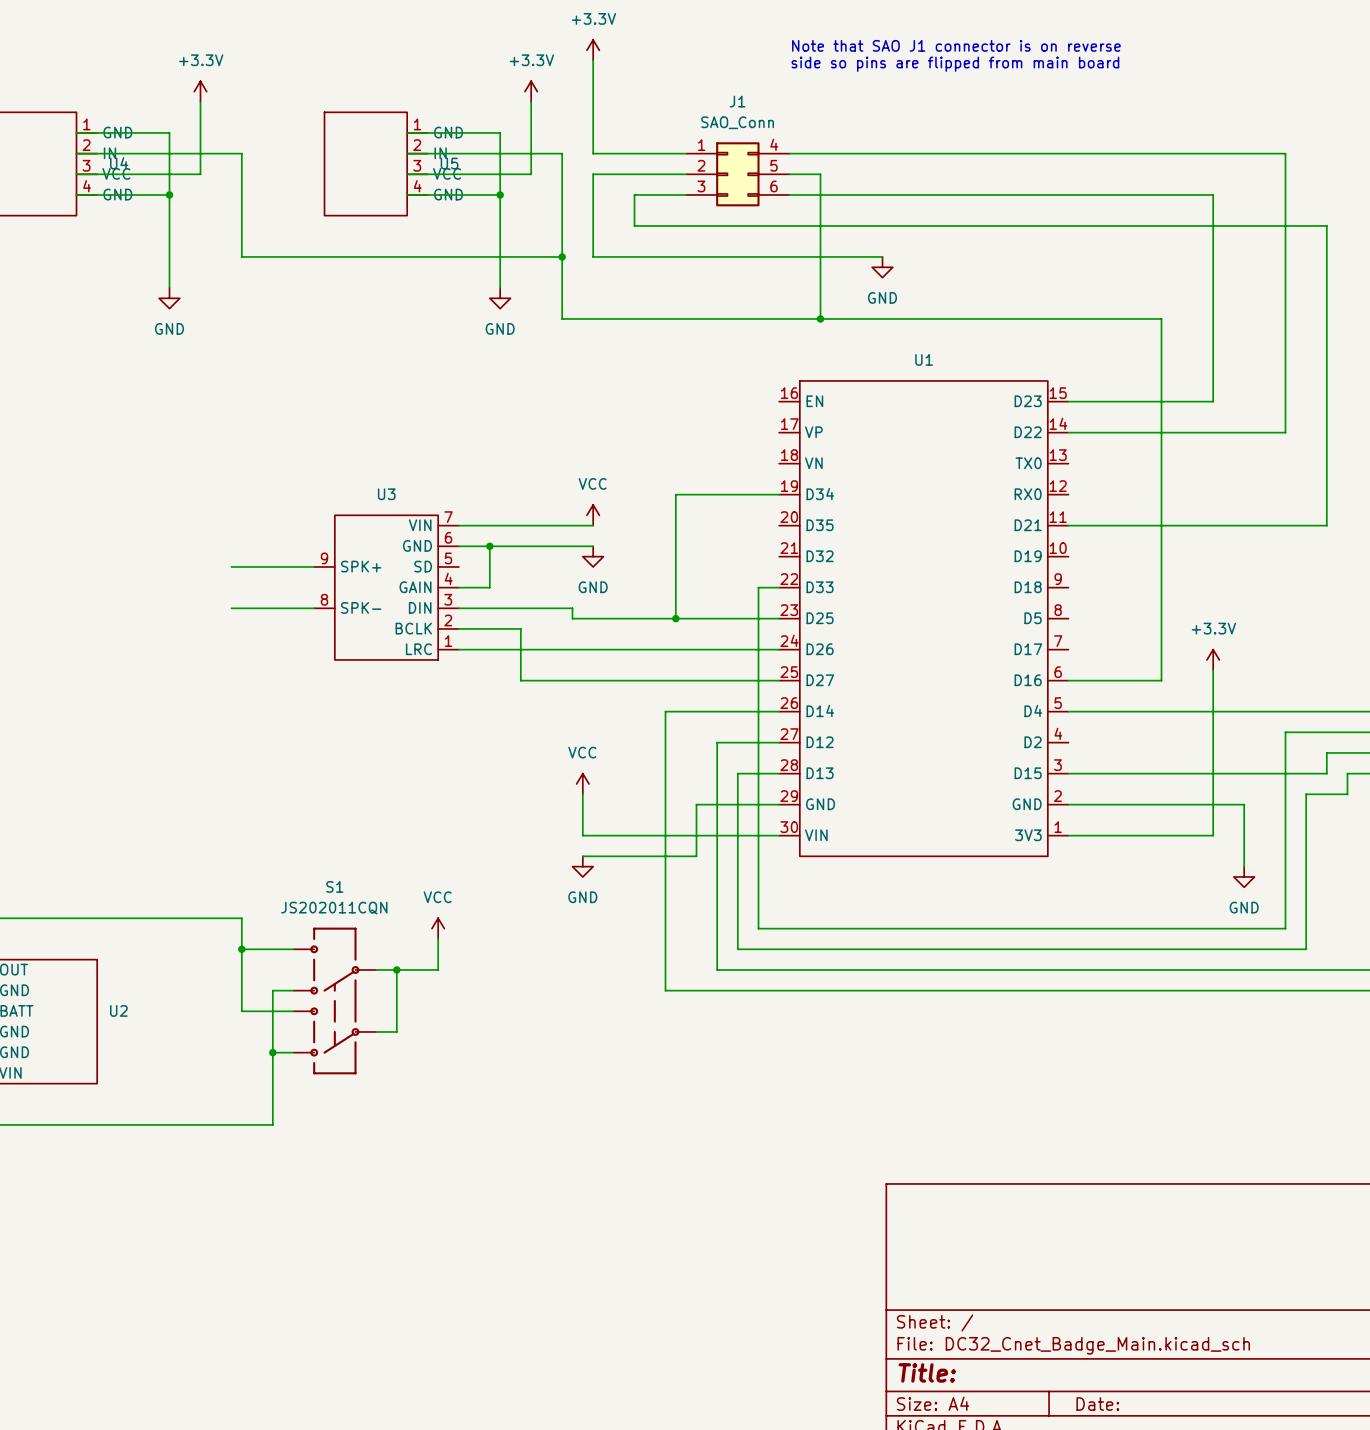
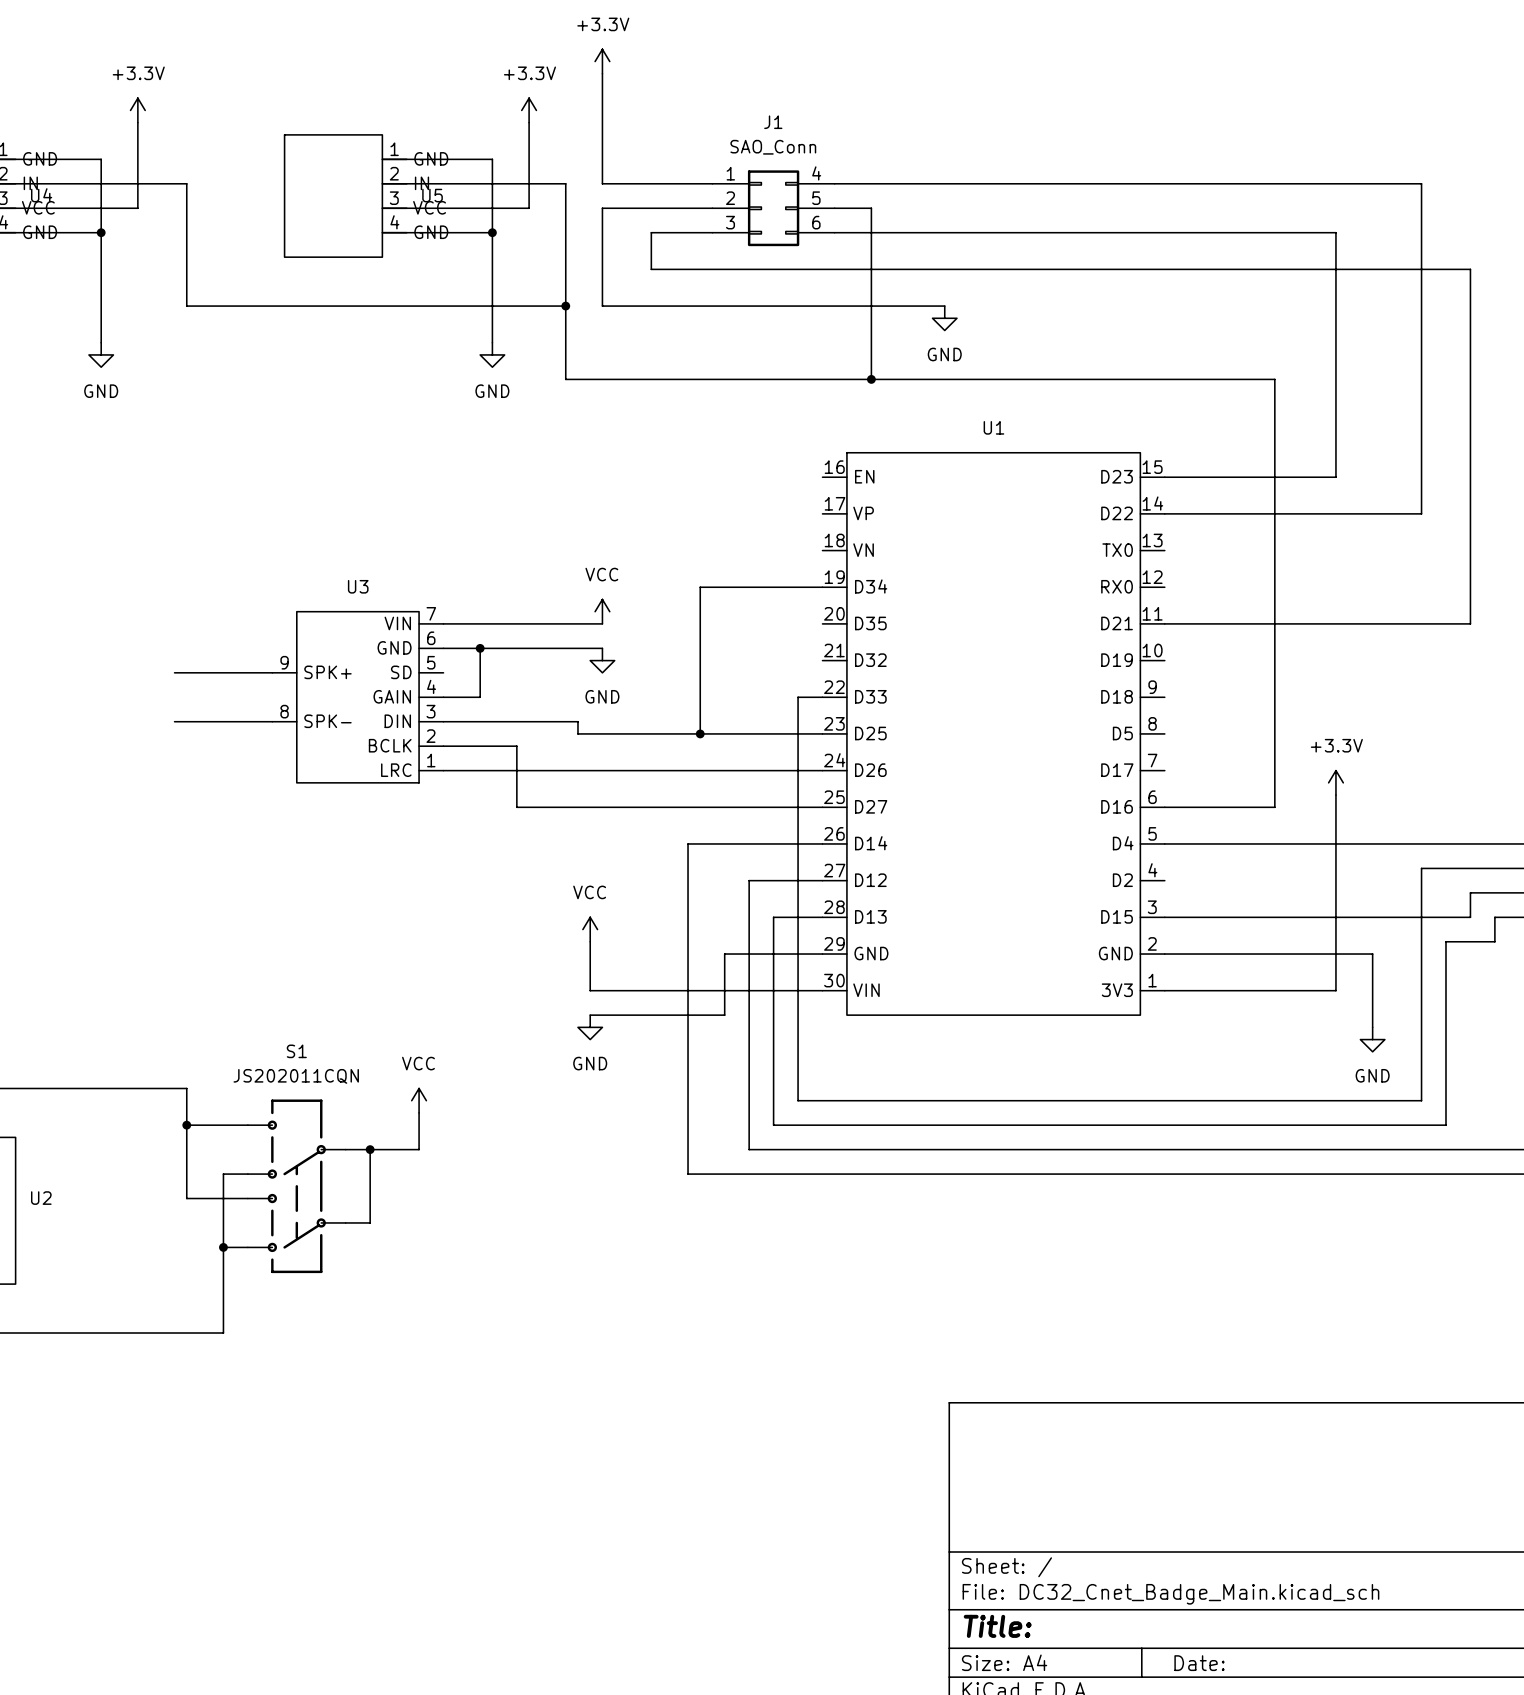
text: Note that SAO J1 connector is on reverse (956, 45) -> none
text: side so pins are flipped from main board (955, 64) -> none

